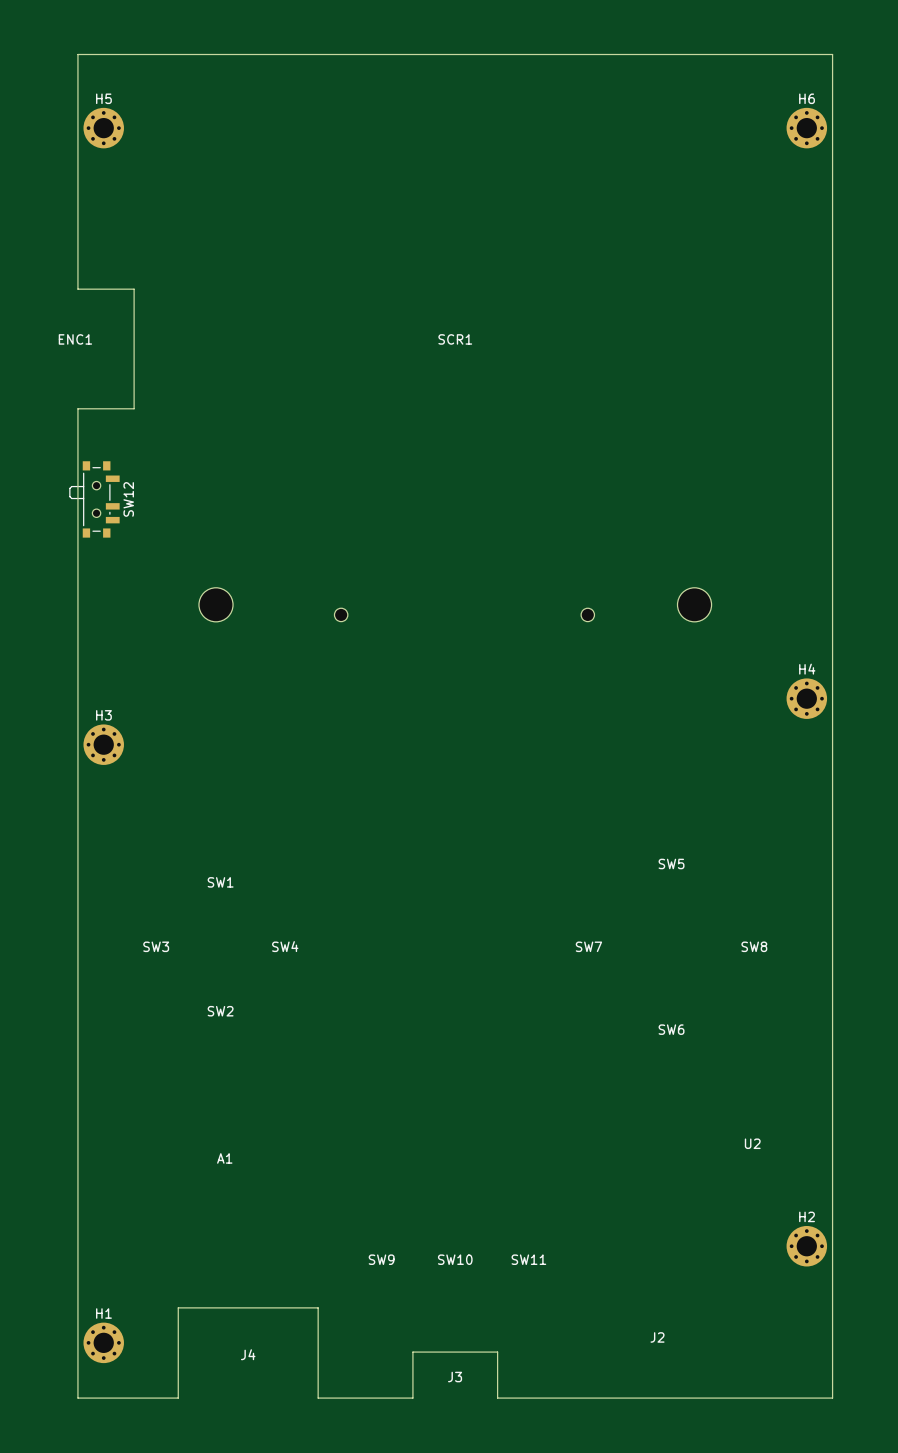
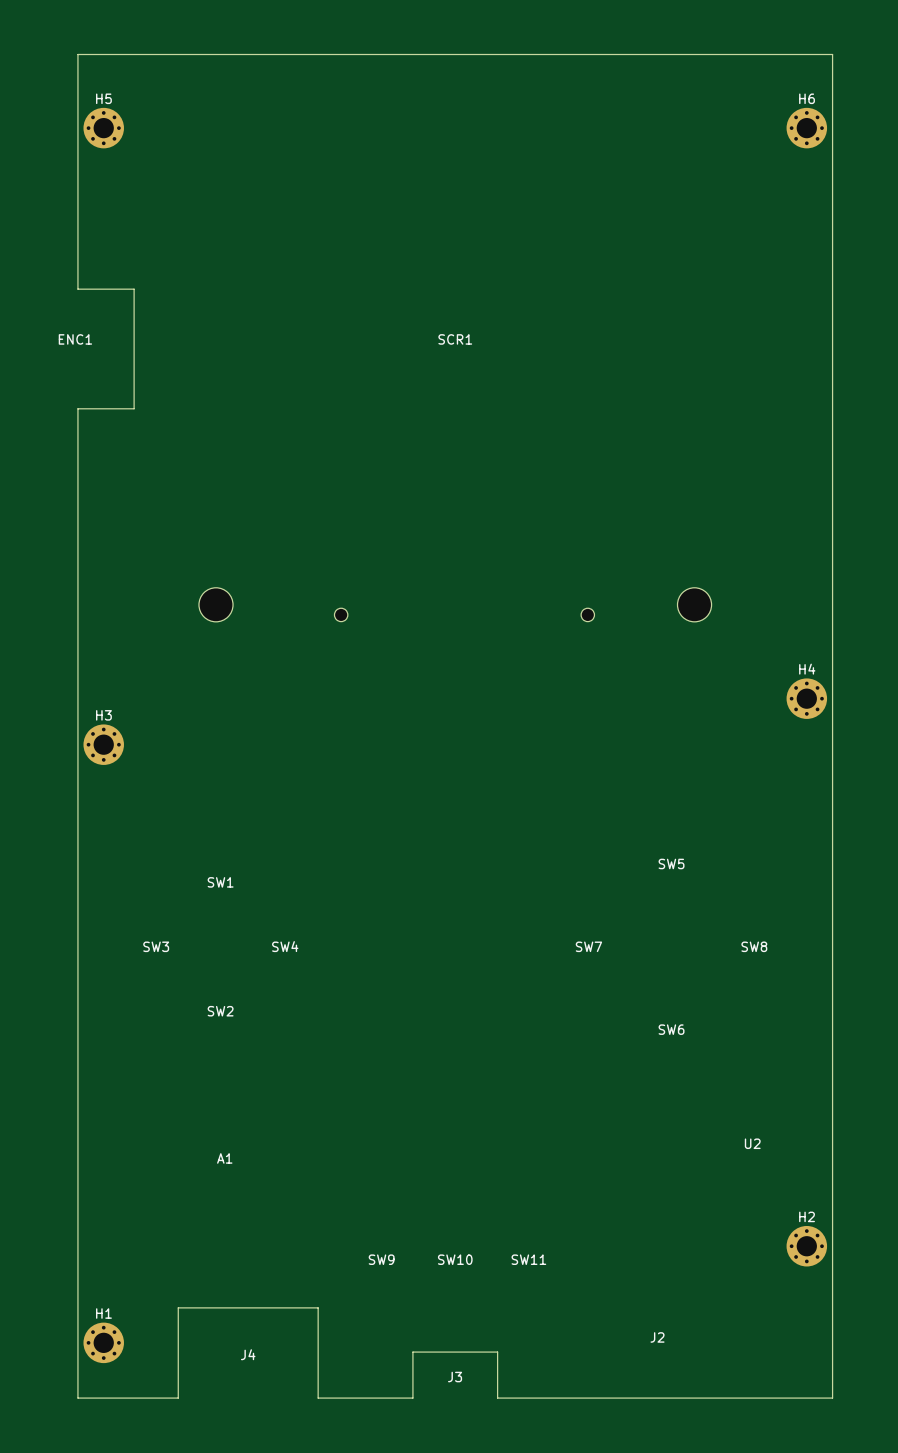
SW12: (94, 499) -> none

